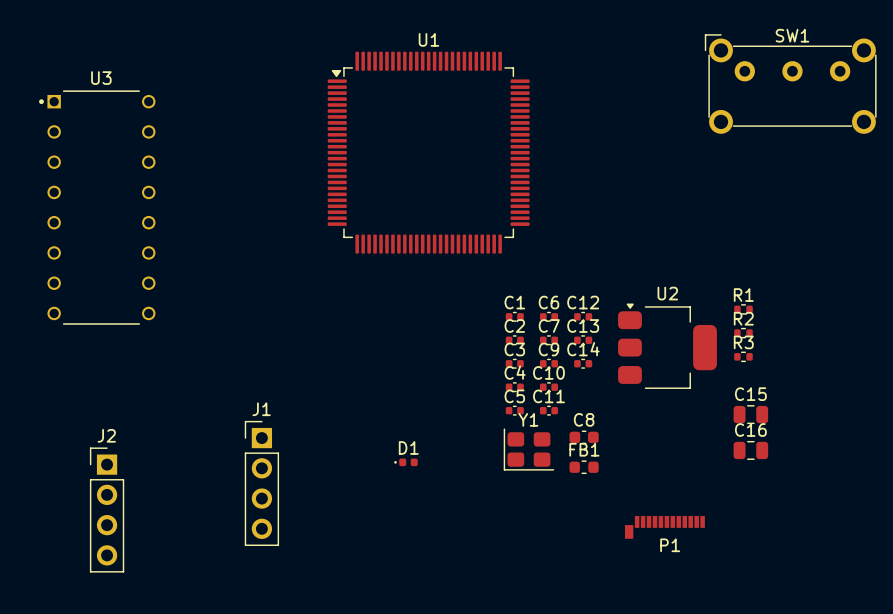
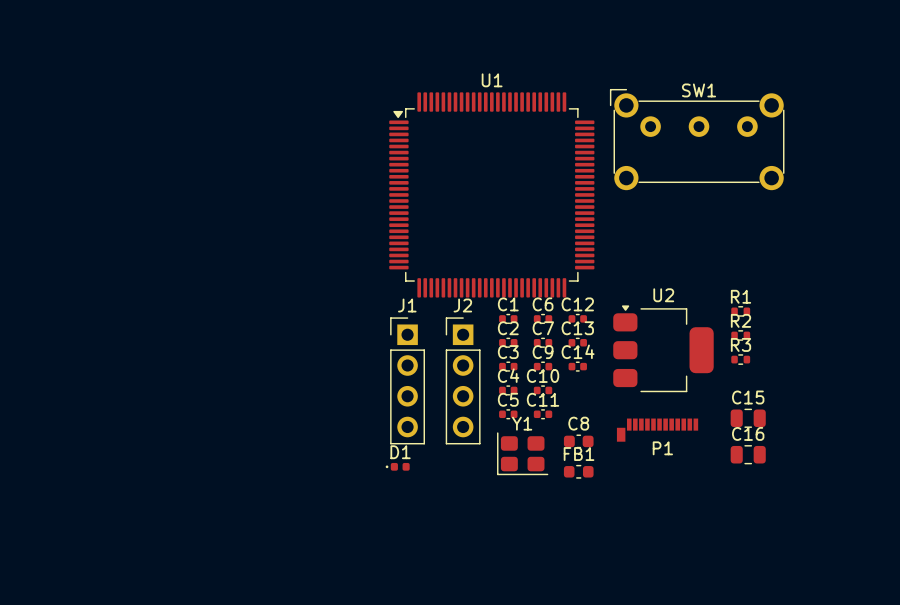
SW1 position: (790, 84) -> (697, 139)
U1 position: (428, 152) -> (491, 194)
U3: (97, 207) -> none
J1 position: (261, 483) -> (407, 380)
J2 position: (107, 510) -> (463, 380)
P1 position: (664, 527) -> (657, 430)

